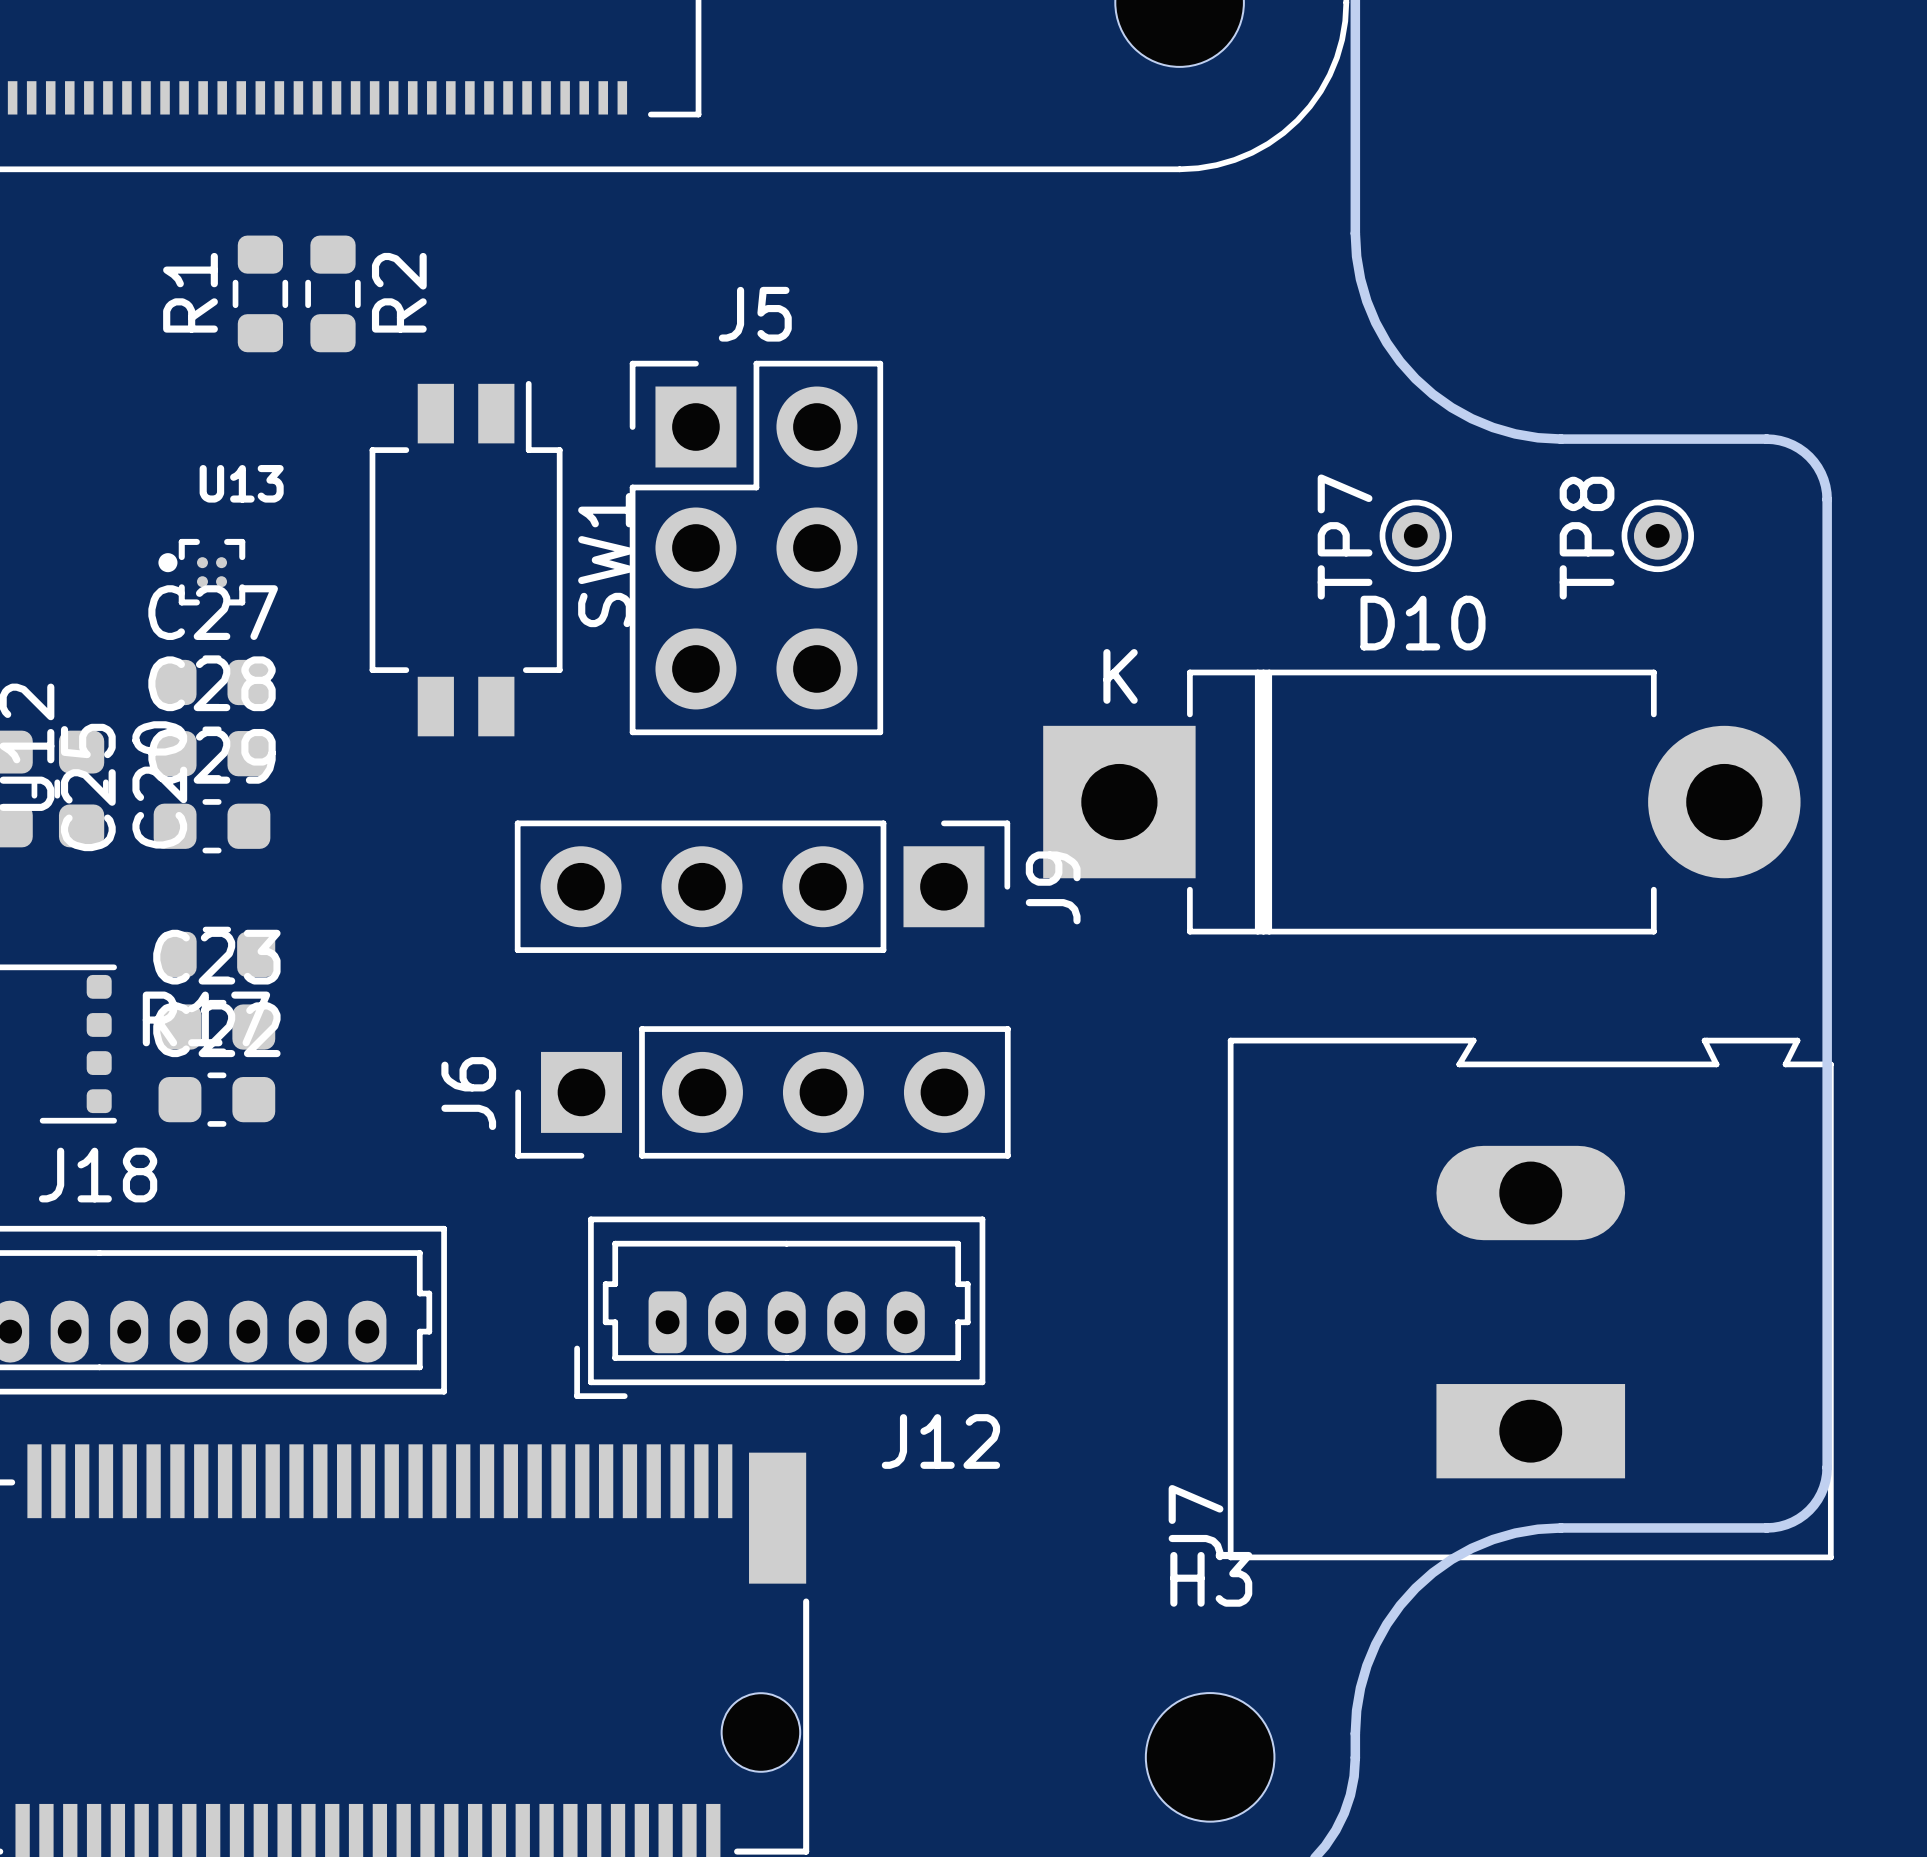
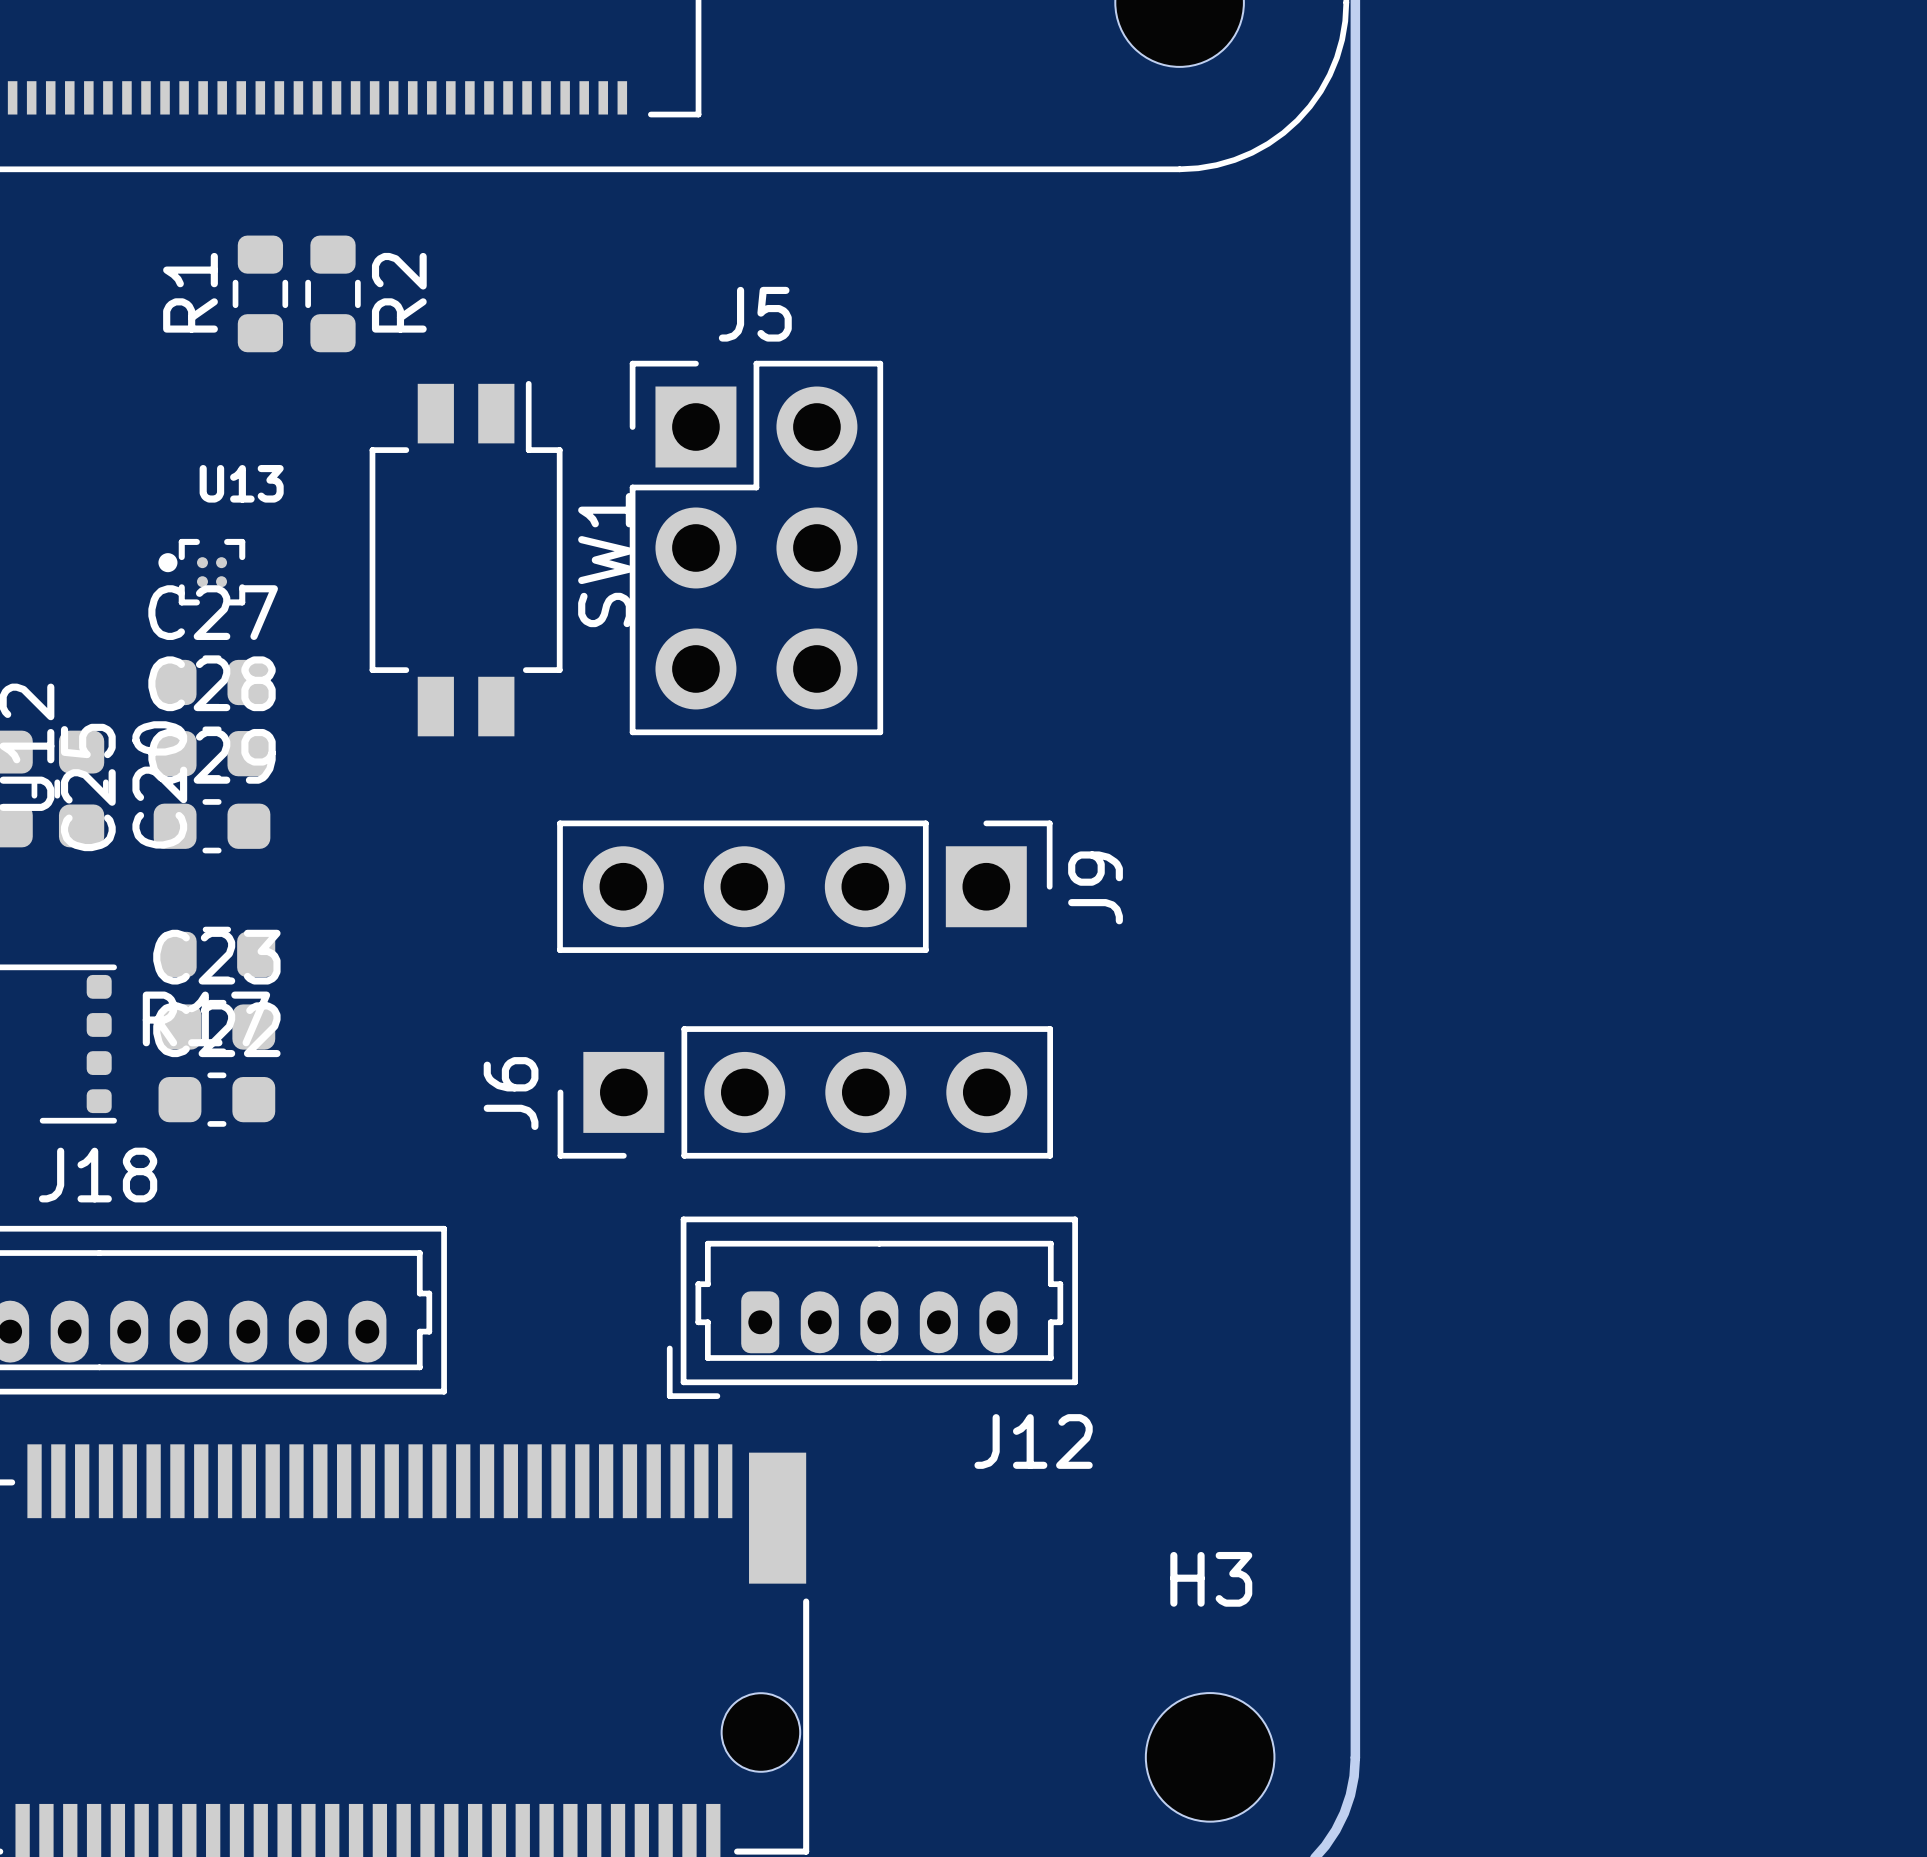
board edge: (1355, 233) (1356, 256) (1366, 301) (1386, 342) (1415, 378) (1451, 407) (1493, 427) (1537, 437) (1780, 440) (1798, 448) (1813, 461) (1823, 479) (1827, 499) (1827, 1467) (1823, 1487) (1817, 1499) (1809, 1510) (1798, 1518) (1780, 1526) (1537, 1529) (1493, 1539) (1471, 1548) (1451, 1559) (1415, 1588) (1386, 1624) (1366, 1665) (1356, 1710) (1355, 1733) -> (1355, 233) (1355, 1733)
TP7: (1415, 535) -> none
TP8: (1657, 535) -> none
D10: (1421, 802) -> none
J9 position: (762, 886) -> (804, 886)
J6 position: (762, 1092) -> (805, 1092)
J7: (1530, 1298) -> none
J12 position: (779, 1307) -> (872, 1307)

